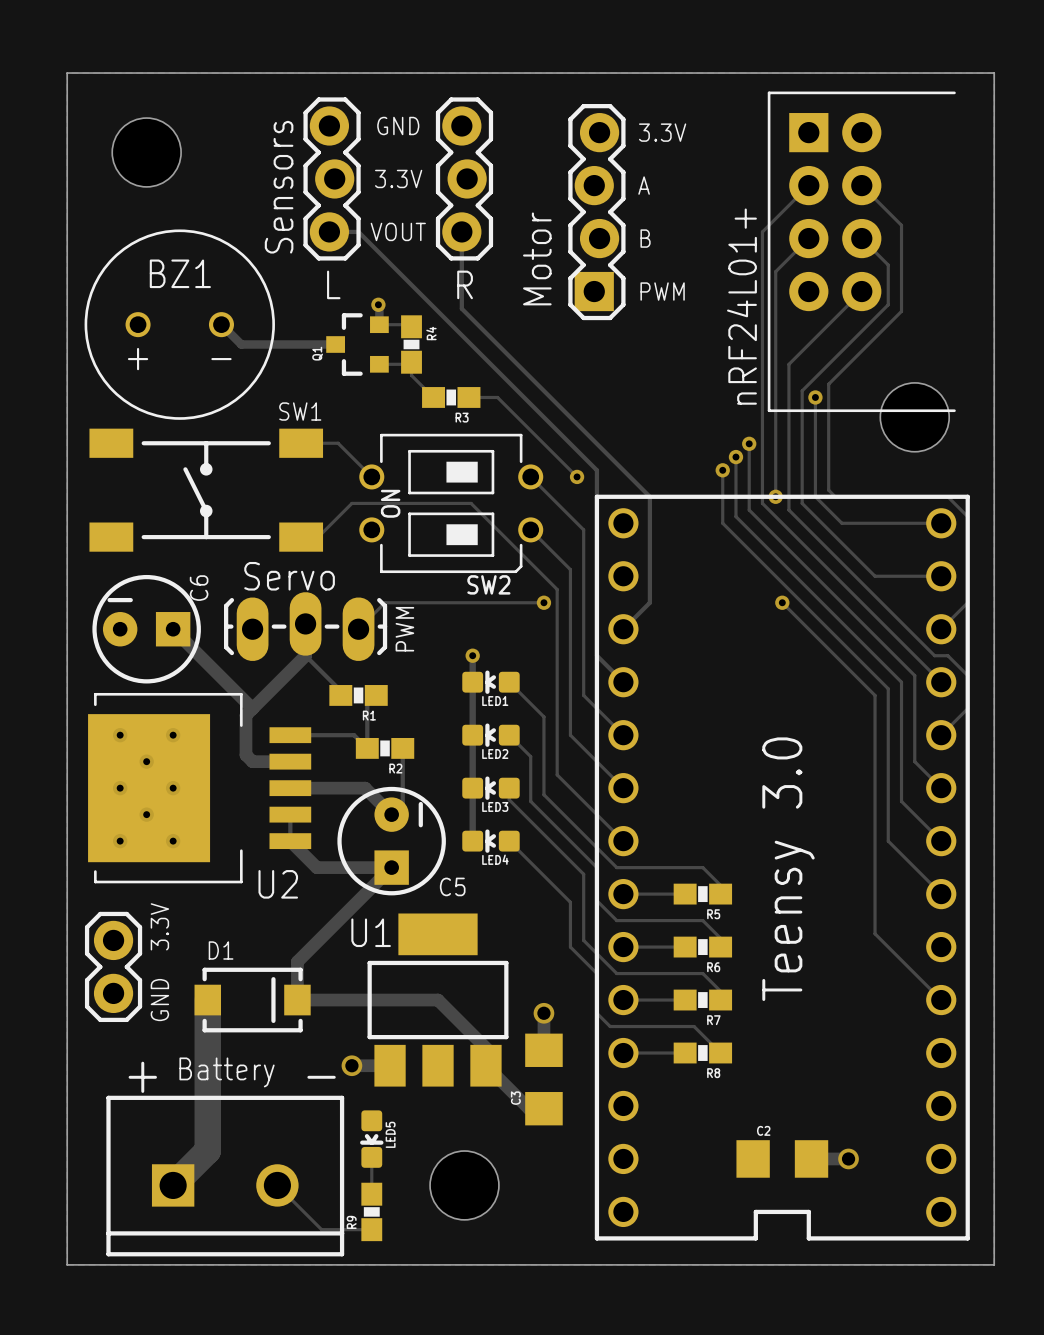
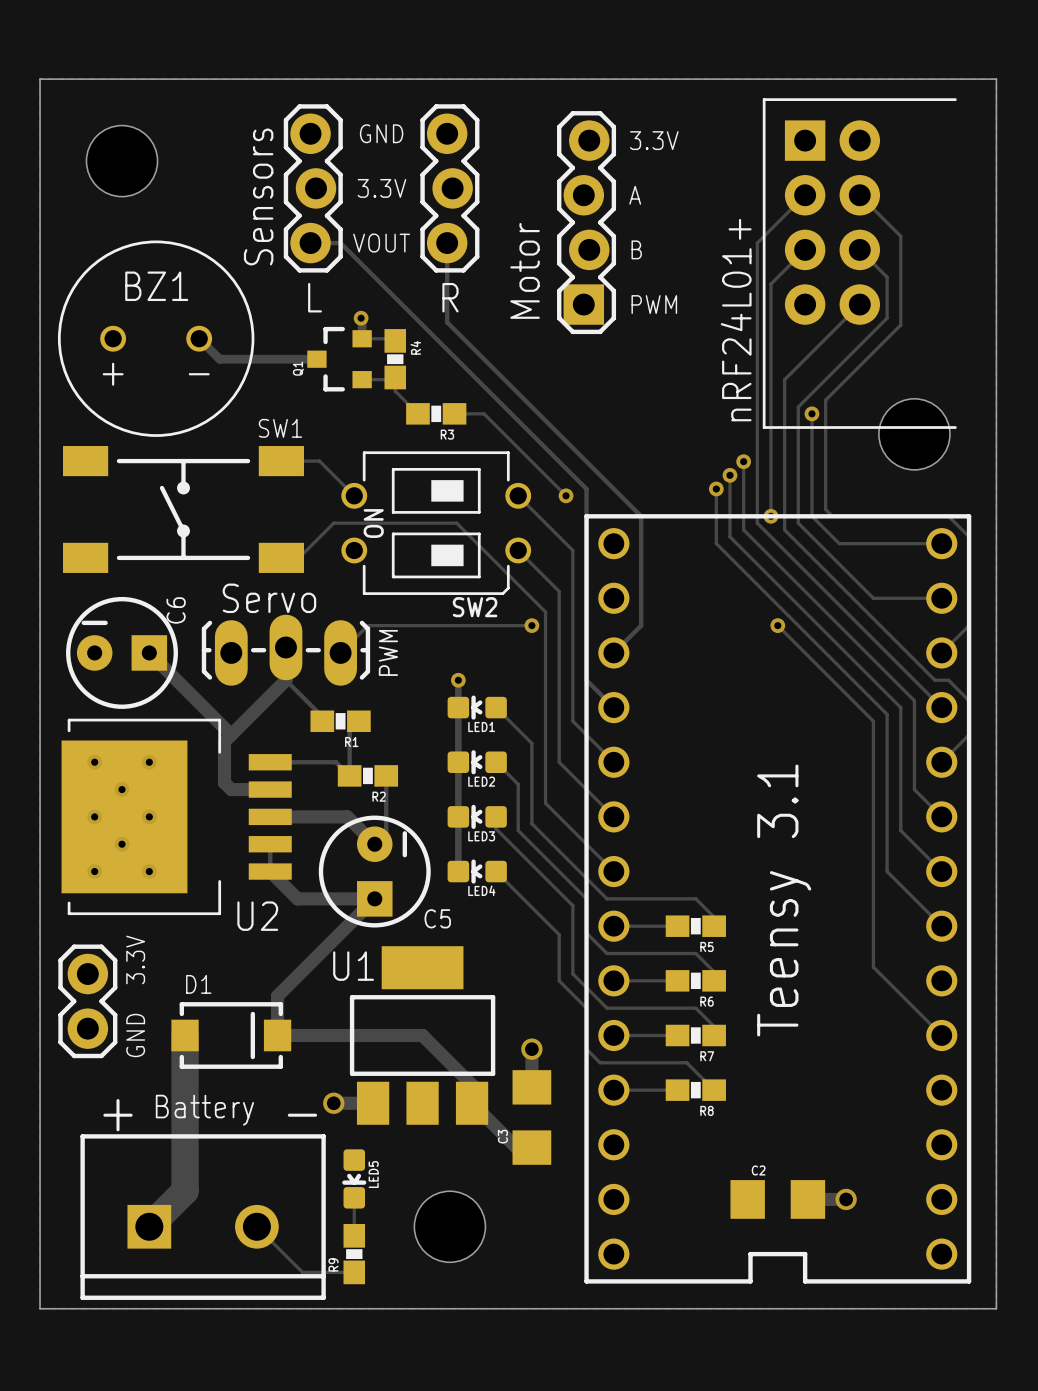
text: Teensy 3.0 (788, 869) -> Teensy 3.1 (784, 900)

